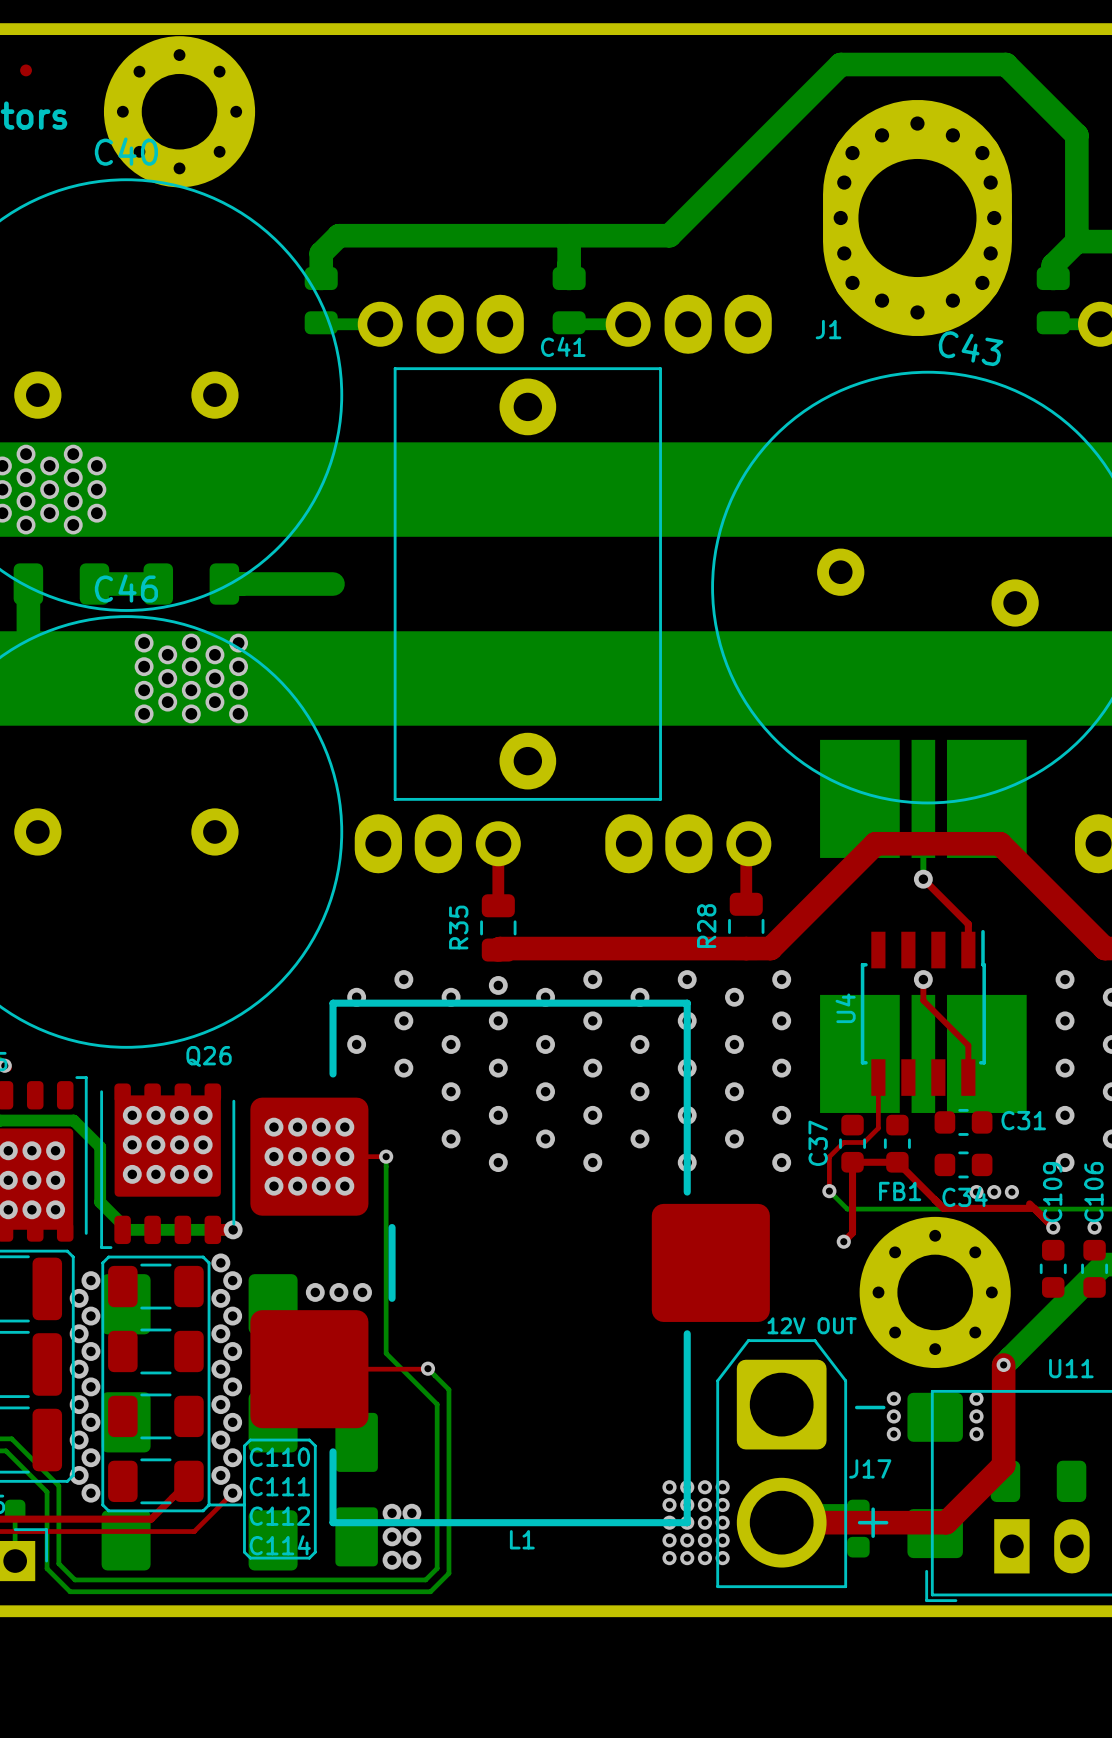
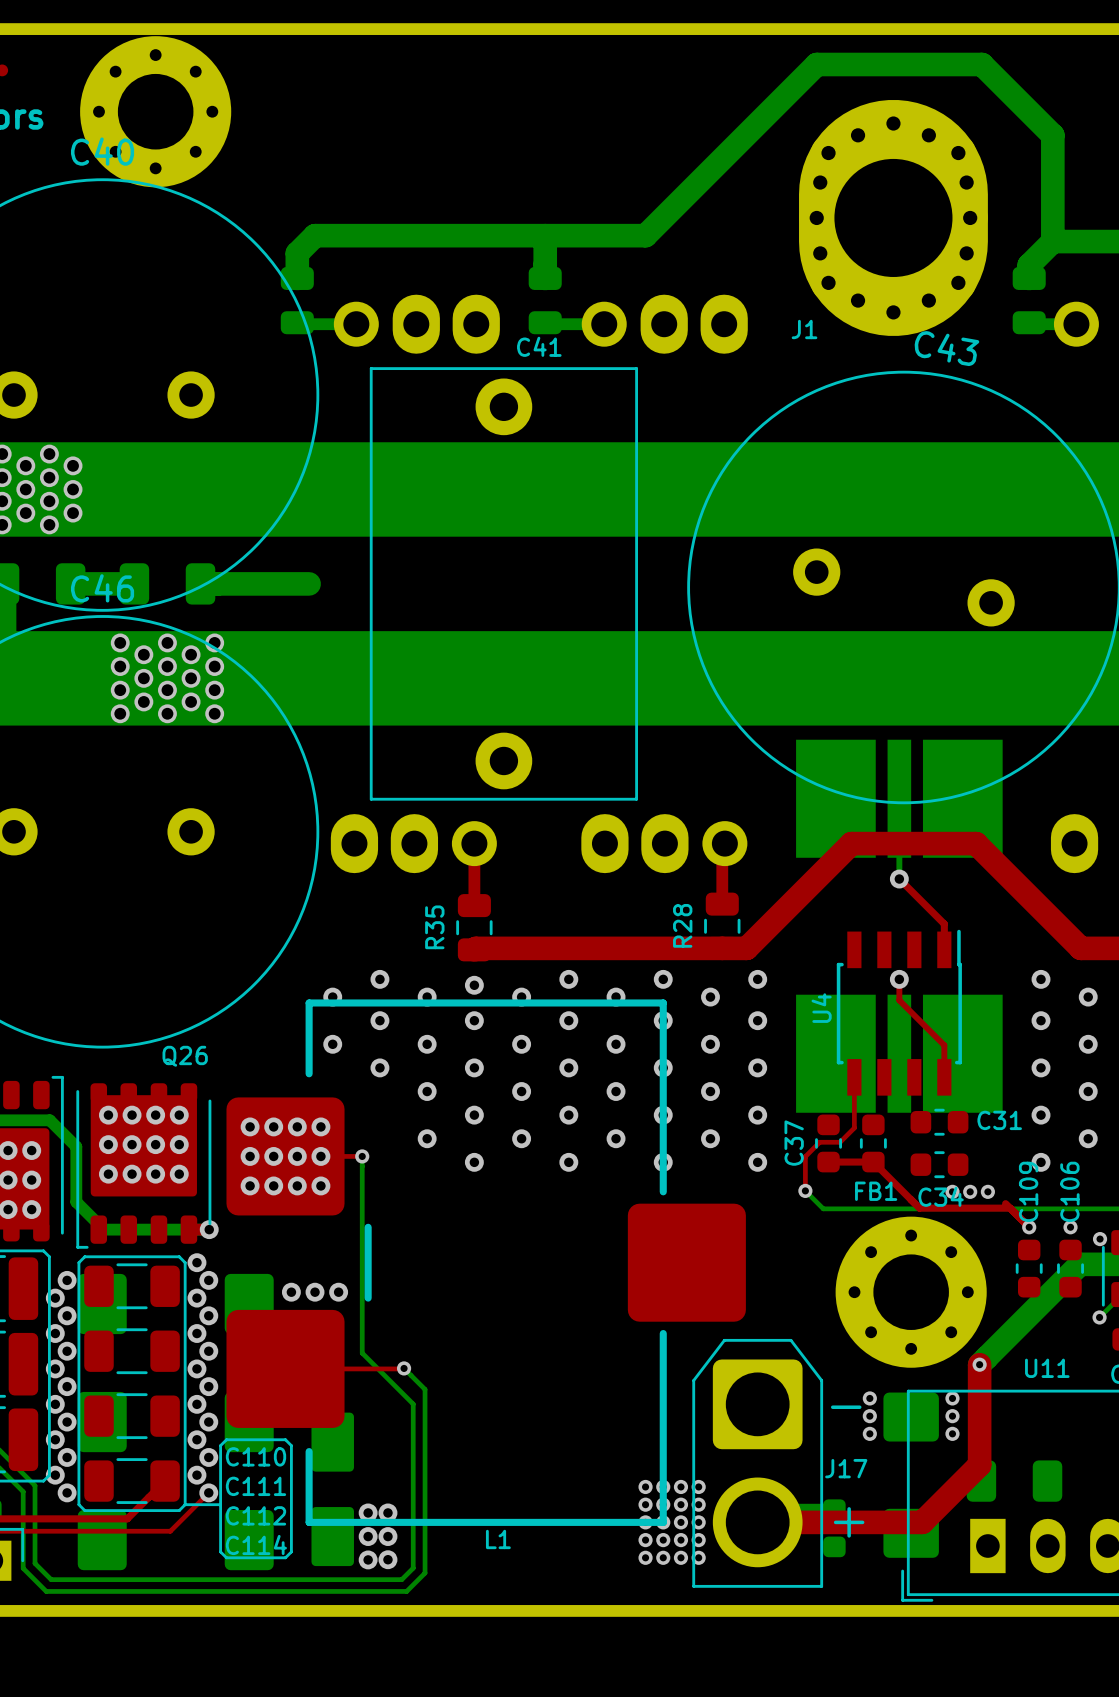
top track: (852, 1162) (852, 1232) (843, 1241) -> none
via: (843, 1241) -> none
J17 value: 12V OUT (812, 1325) -> none

